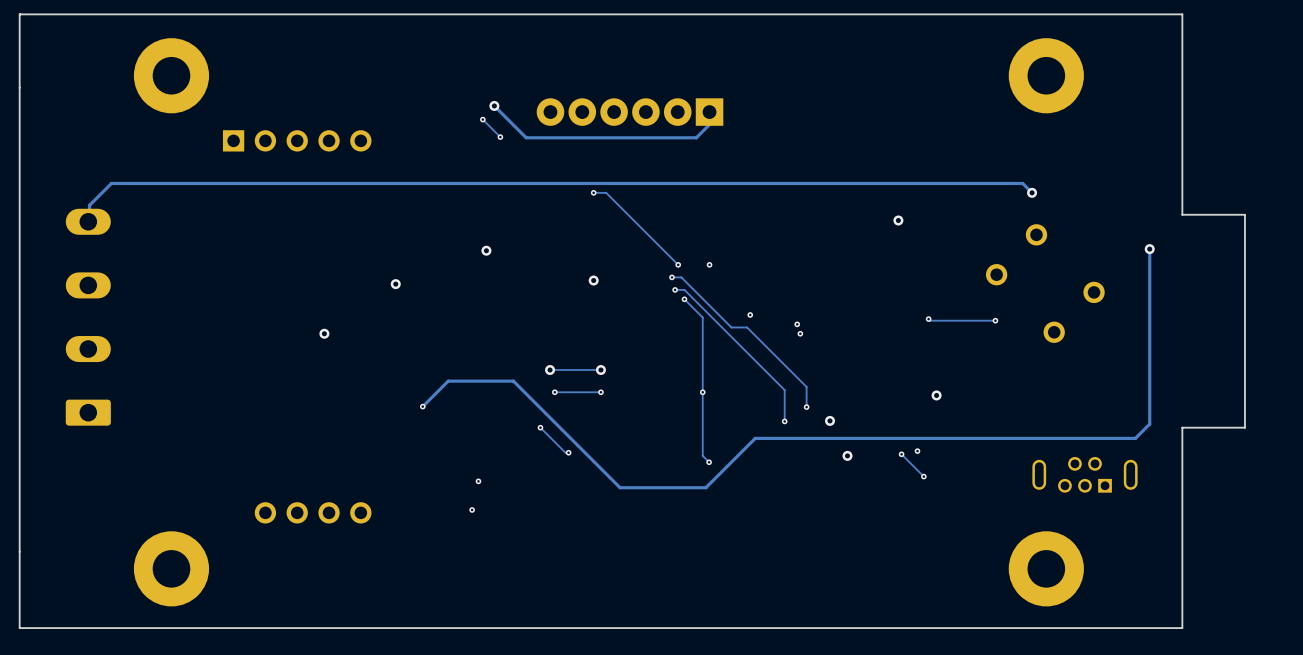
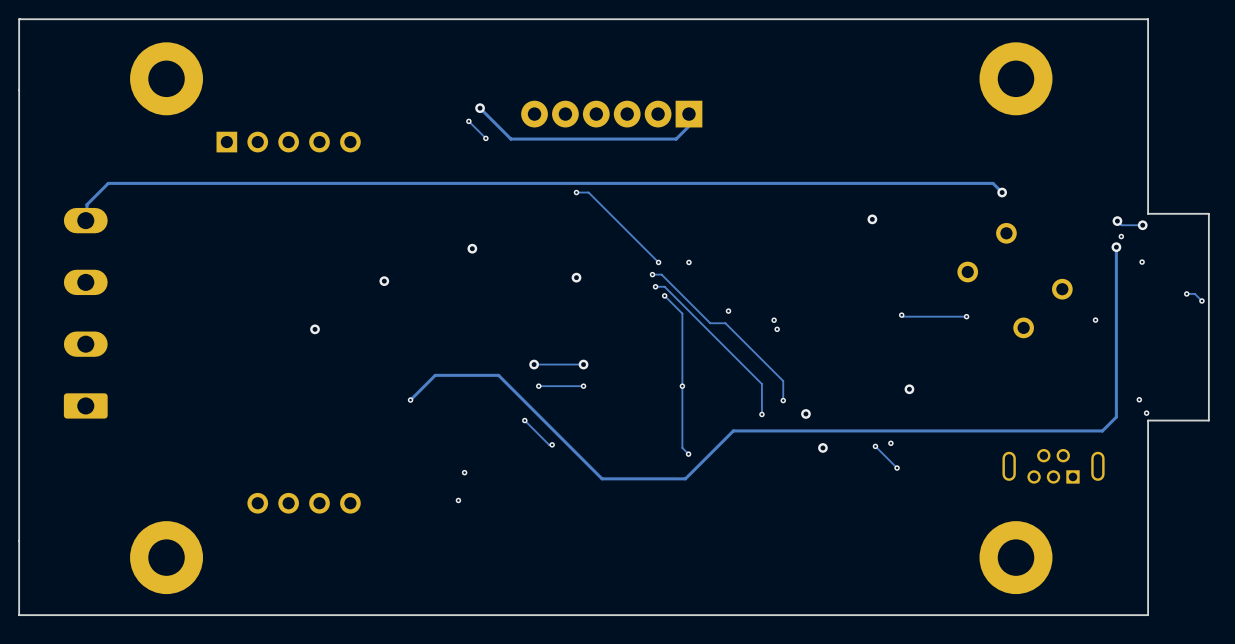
track: none -> (1117, 221) (1121, 225) (1142, 225)
via: none -> (1117, 221)
via: none -> (1142, 225)
via: none -> (1121, 236)
via: none -> (1142, 262)
track: none -> (1186, 293) (1194, 293) (1201, 301)
via: none -> (1186, 293)
via: none -> (1201, 301)
via: none -> (1095, 320)
via: none -> (1139, 399)
via: none -> (1146, 413)

